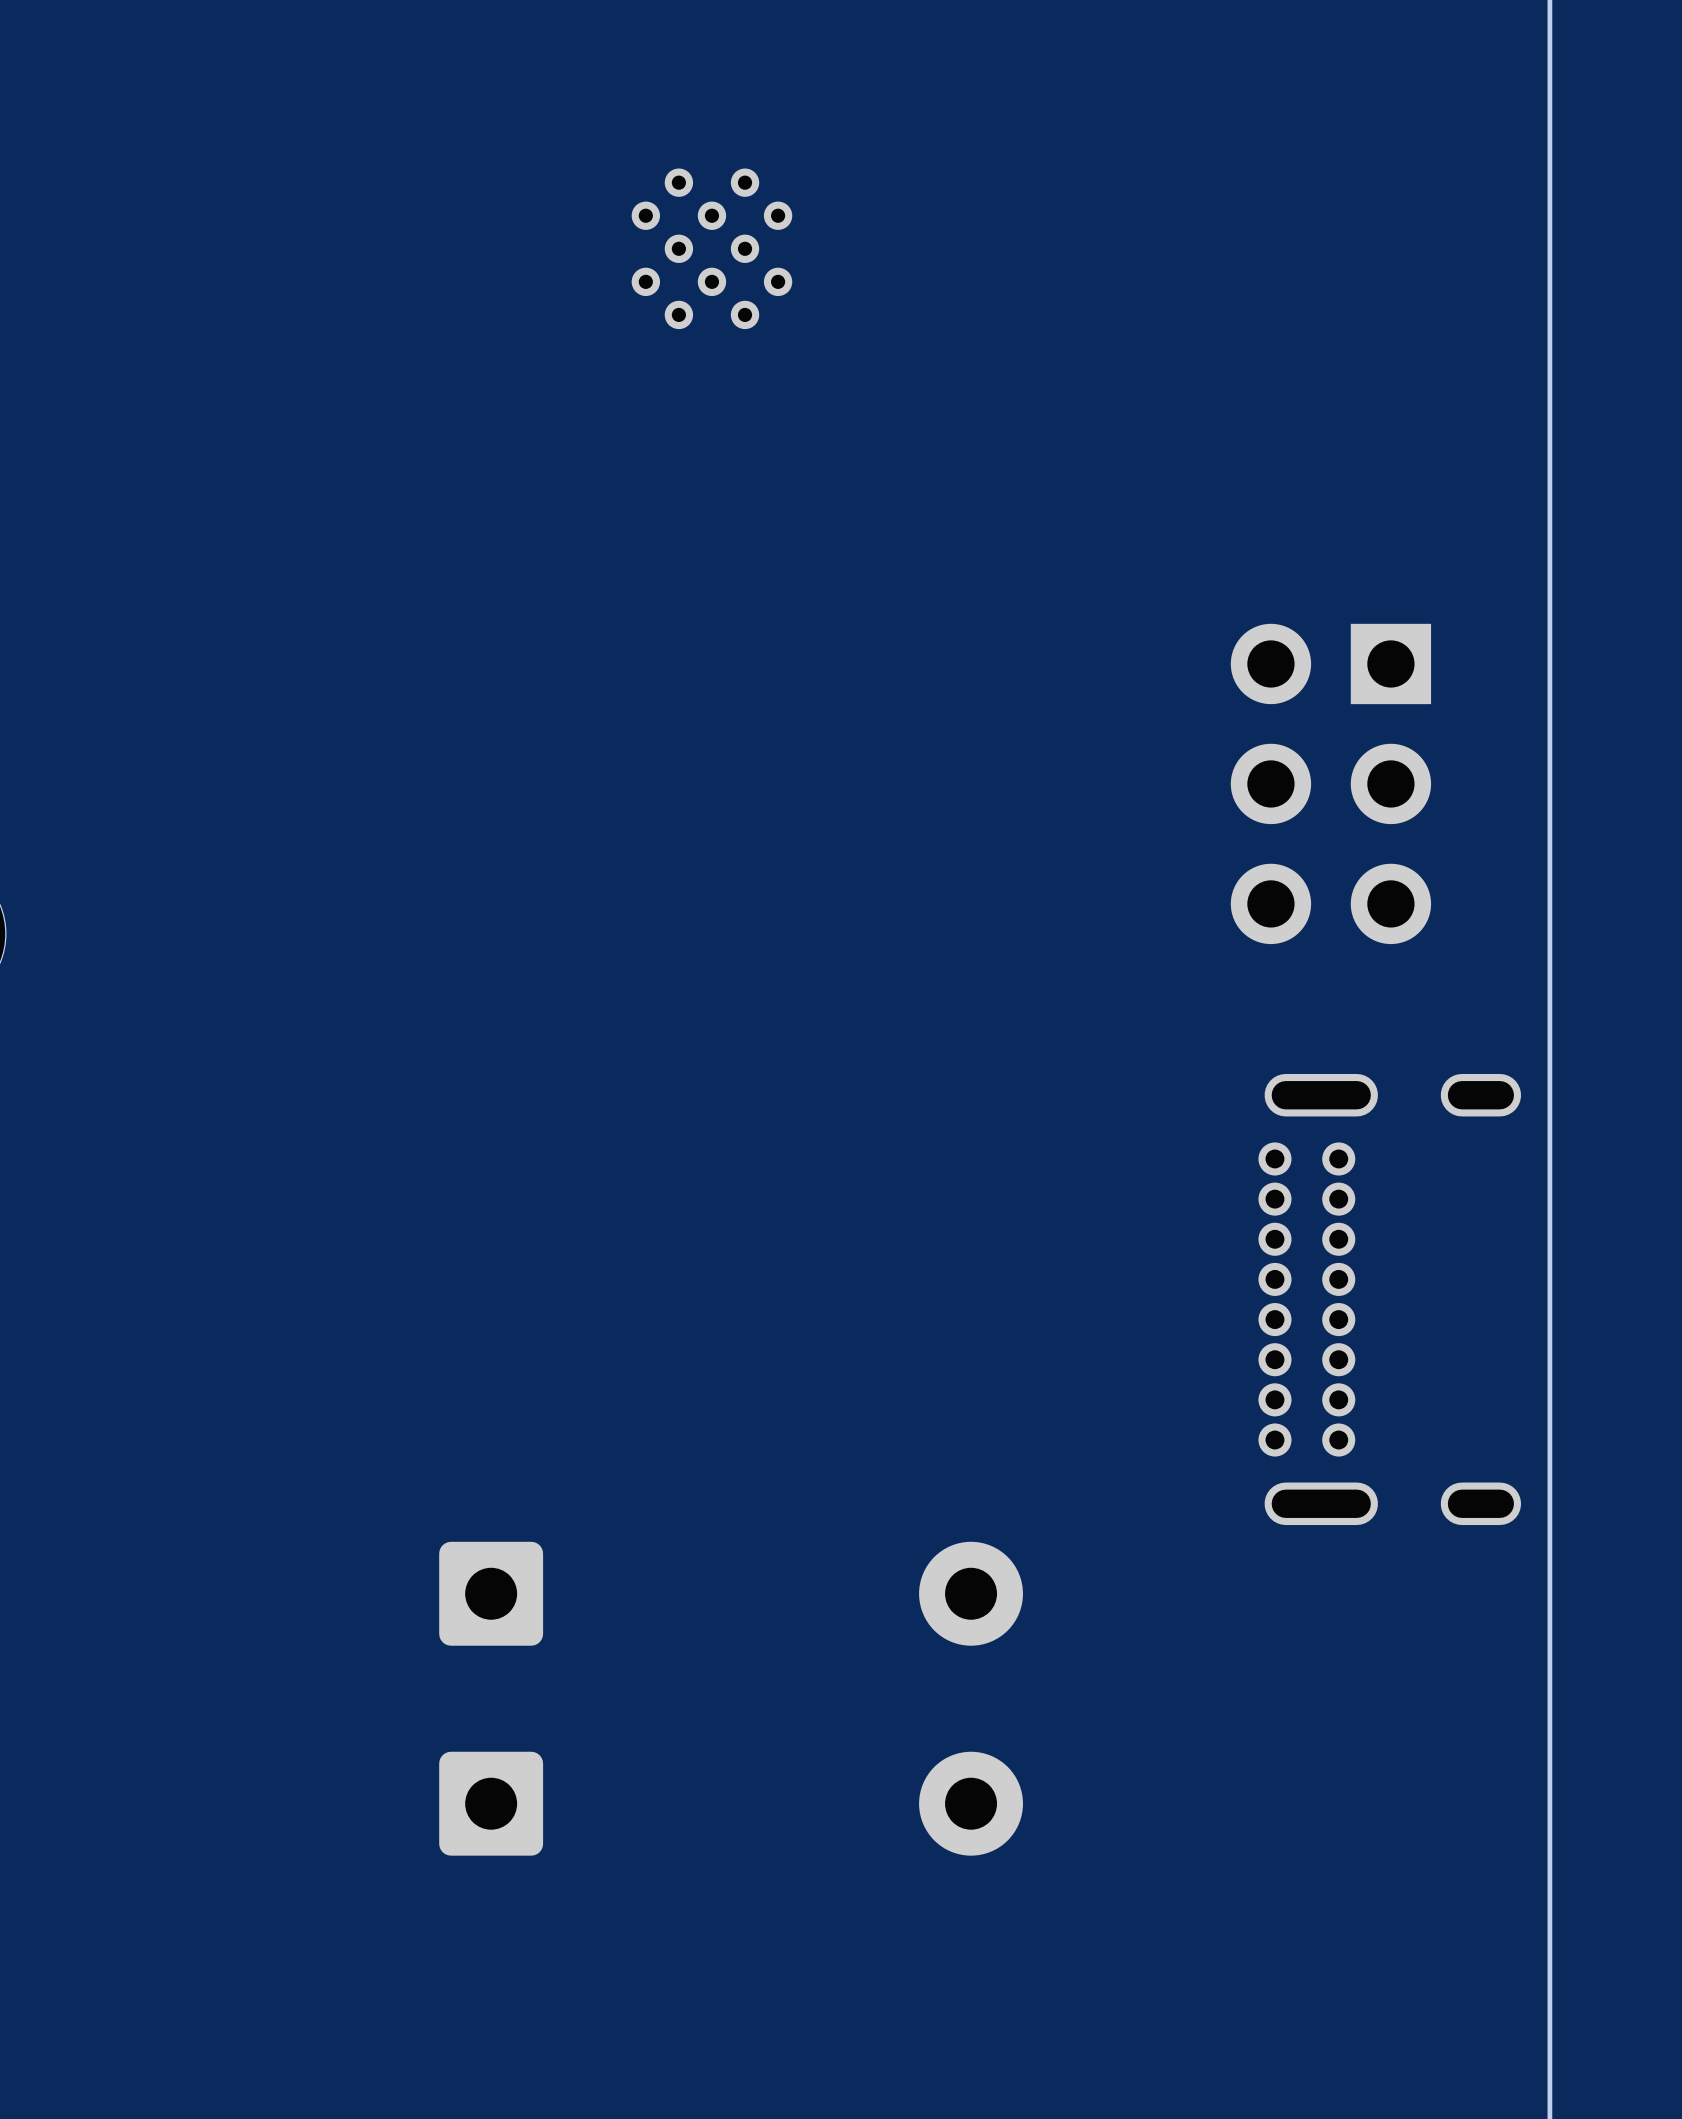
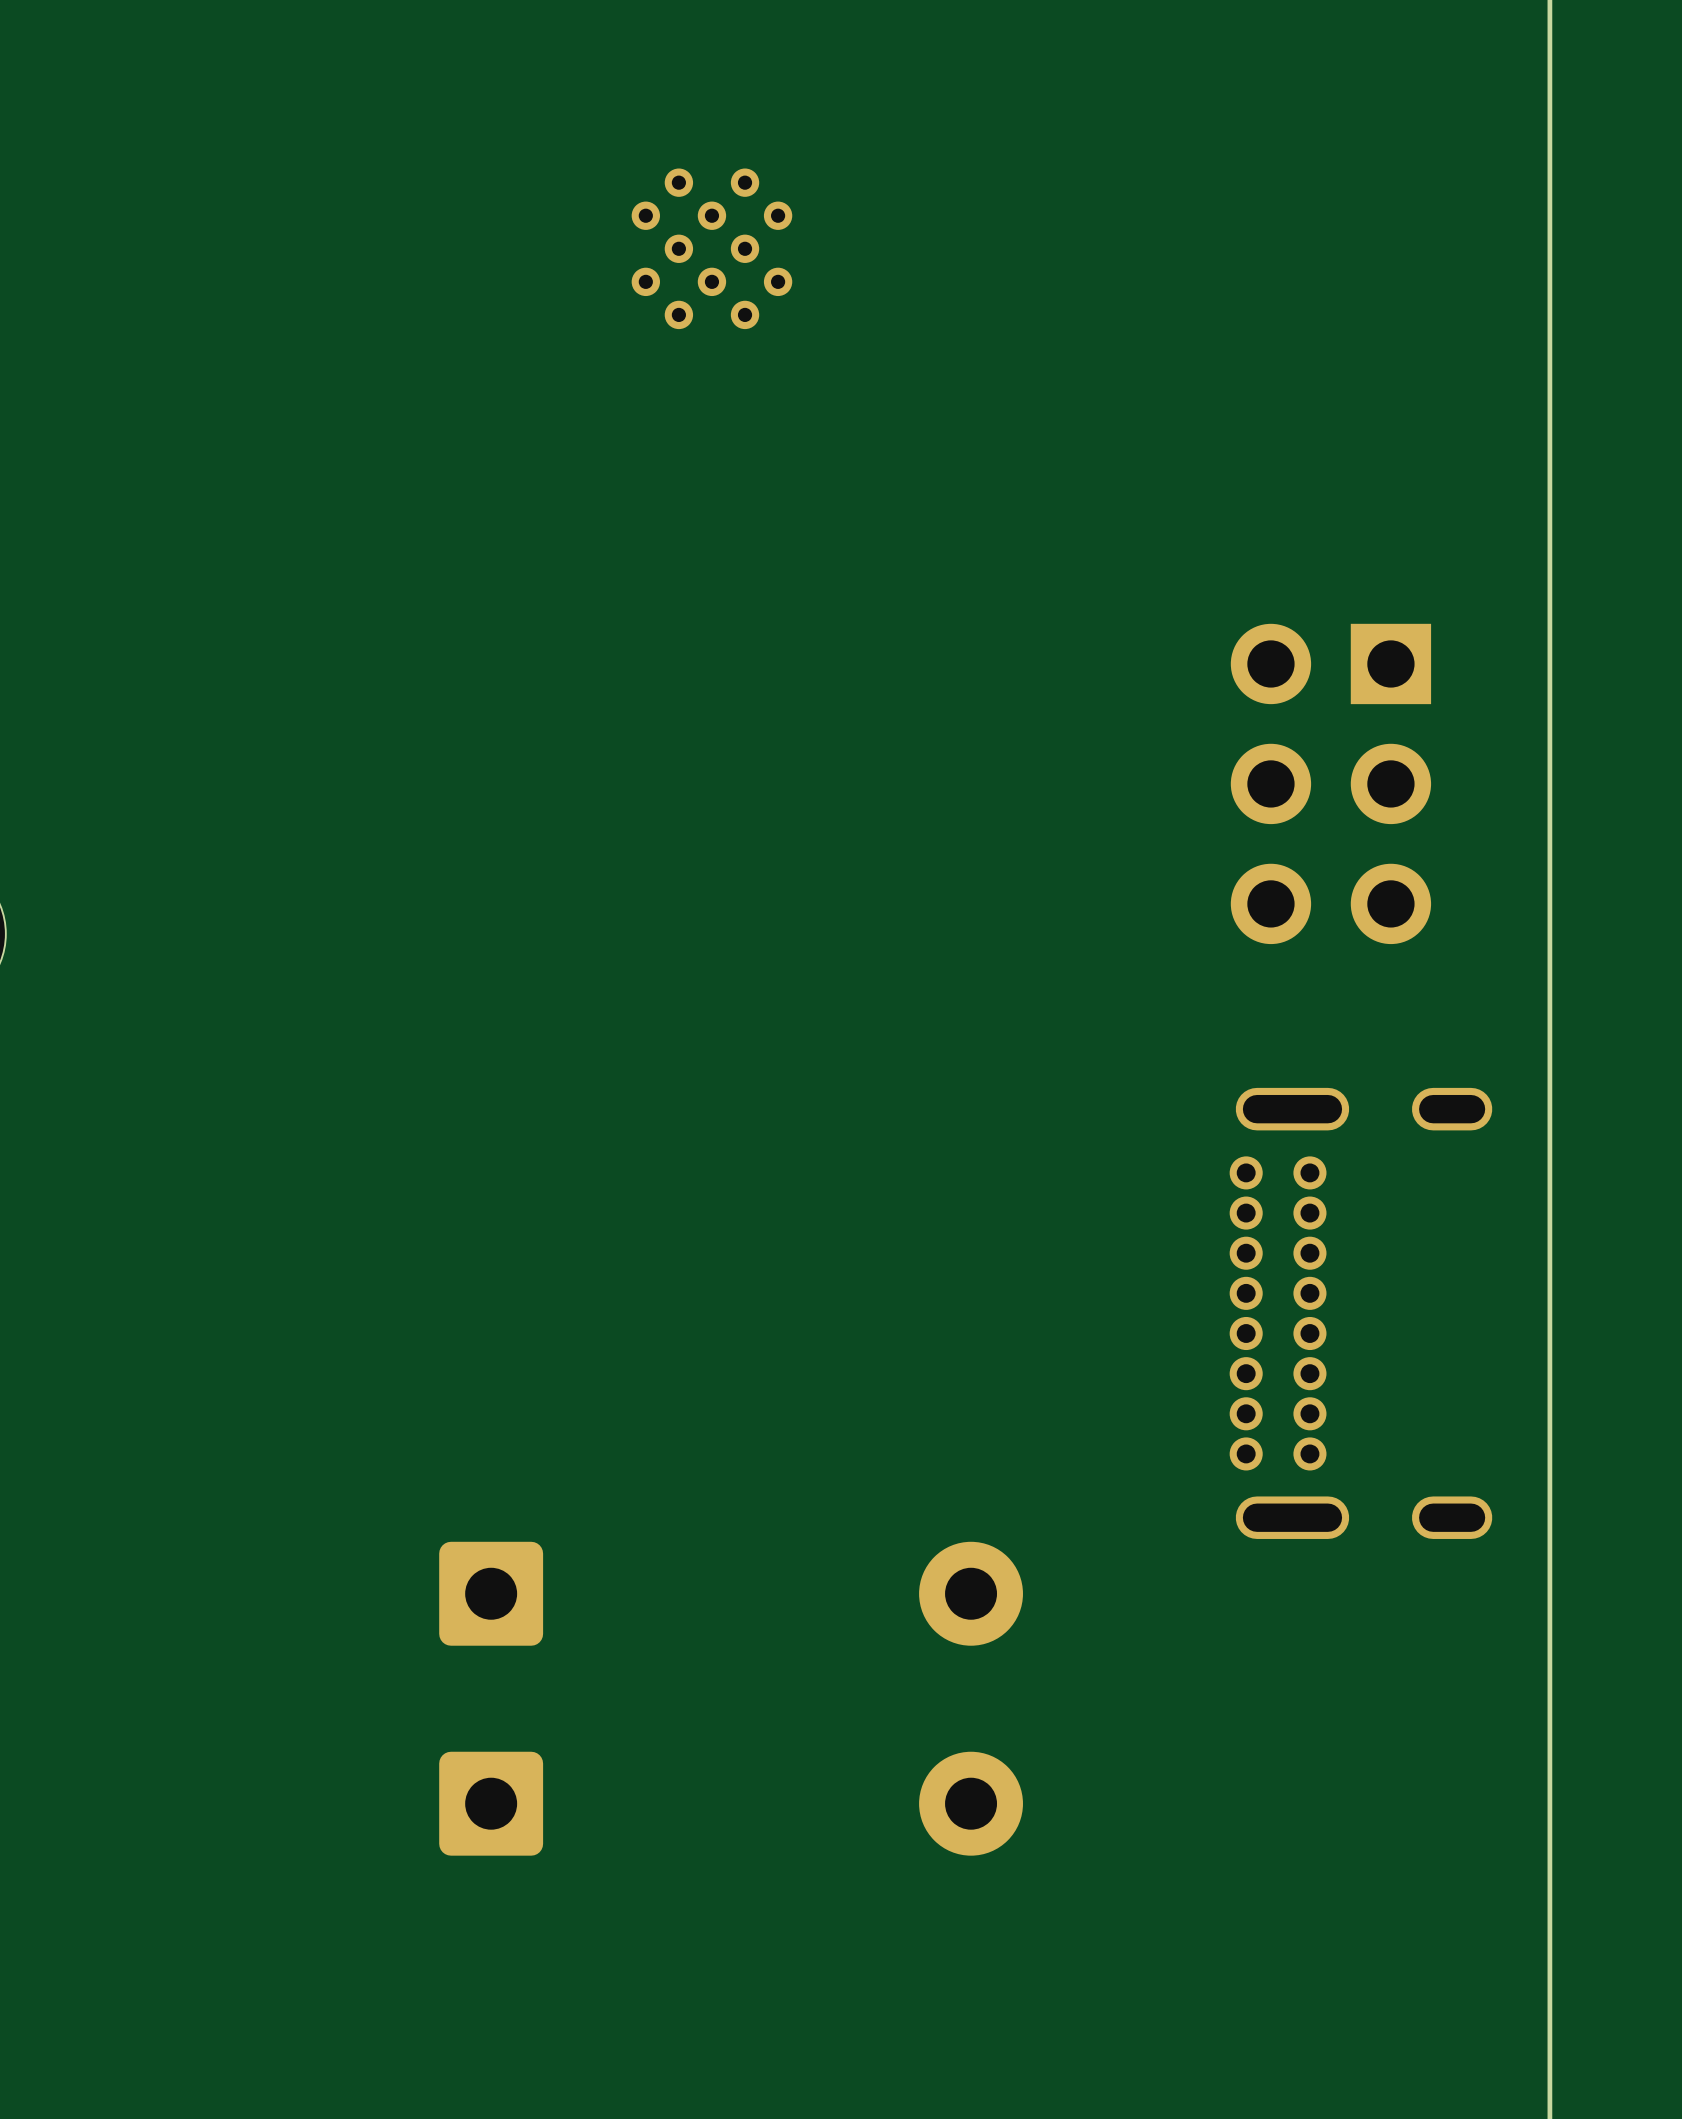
part position: (1389, 1299) -> (1360, 1313)

